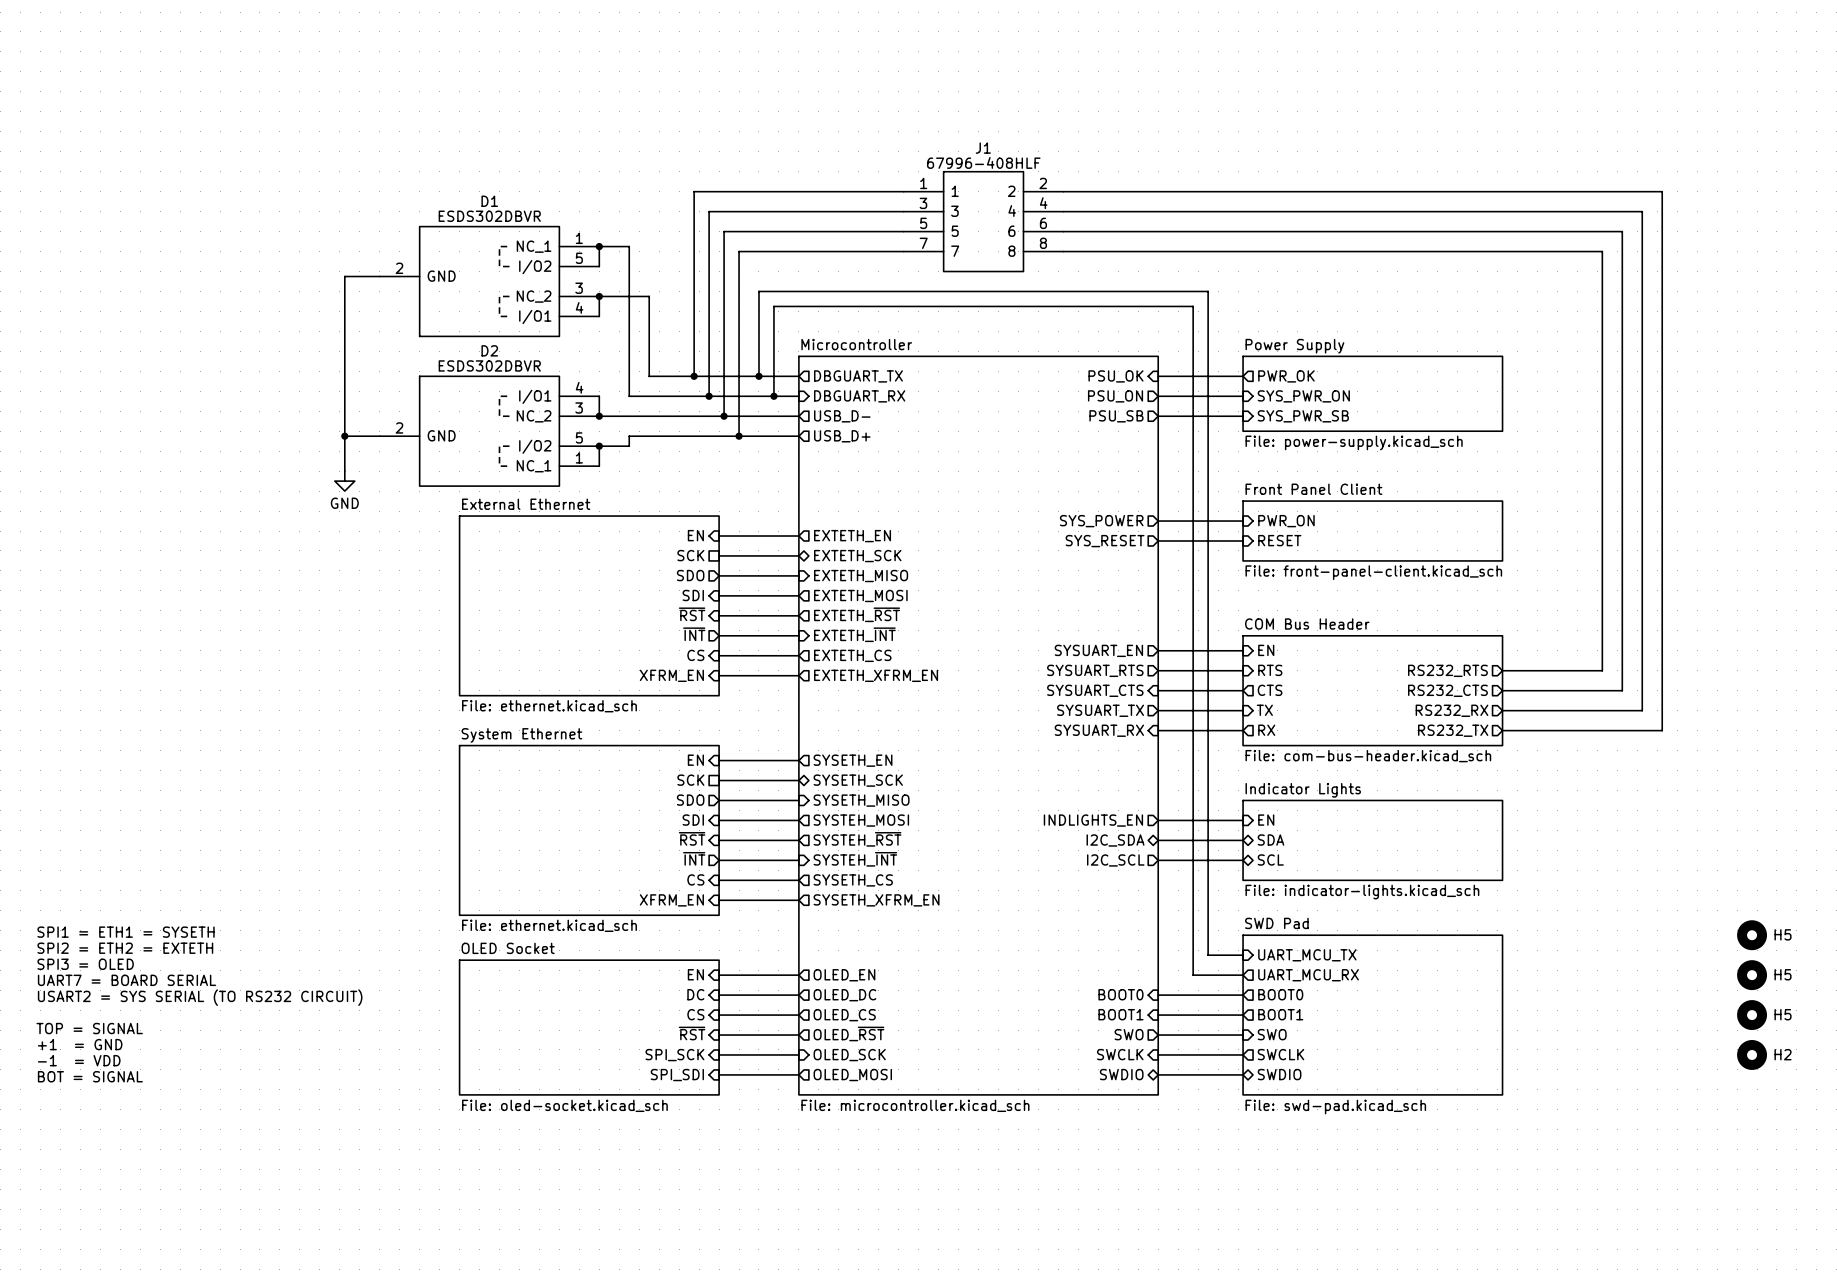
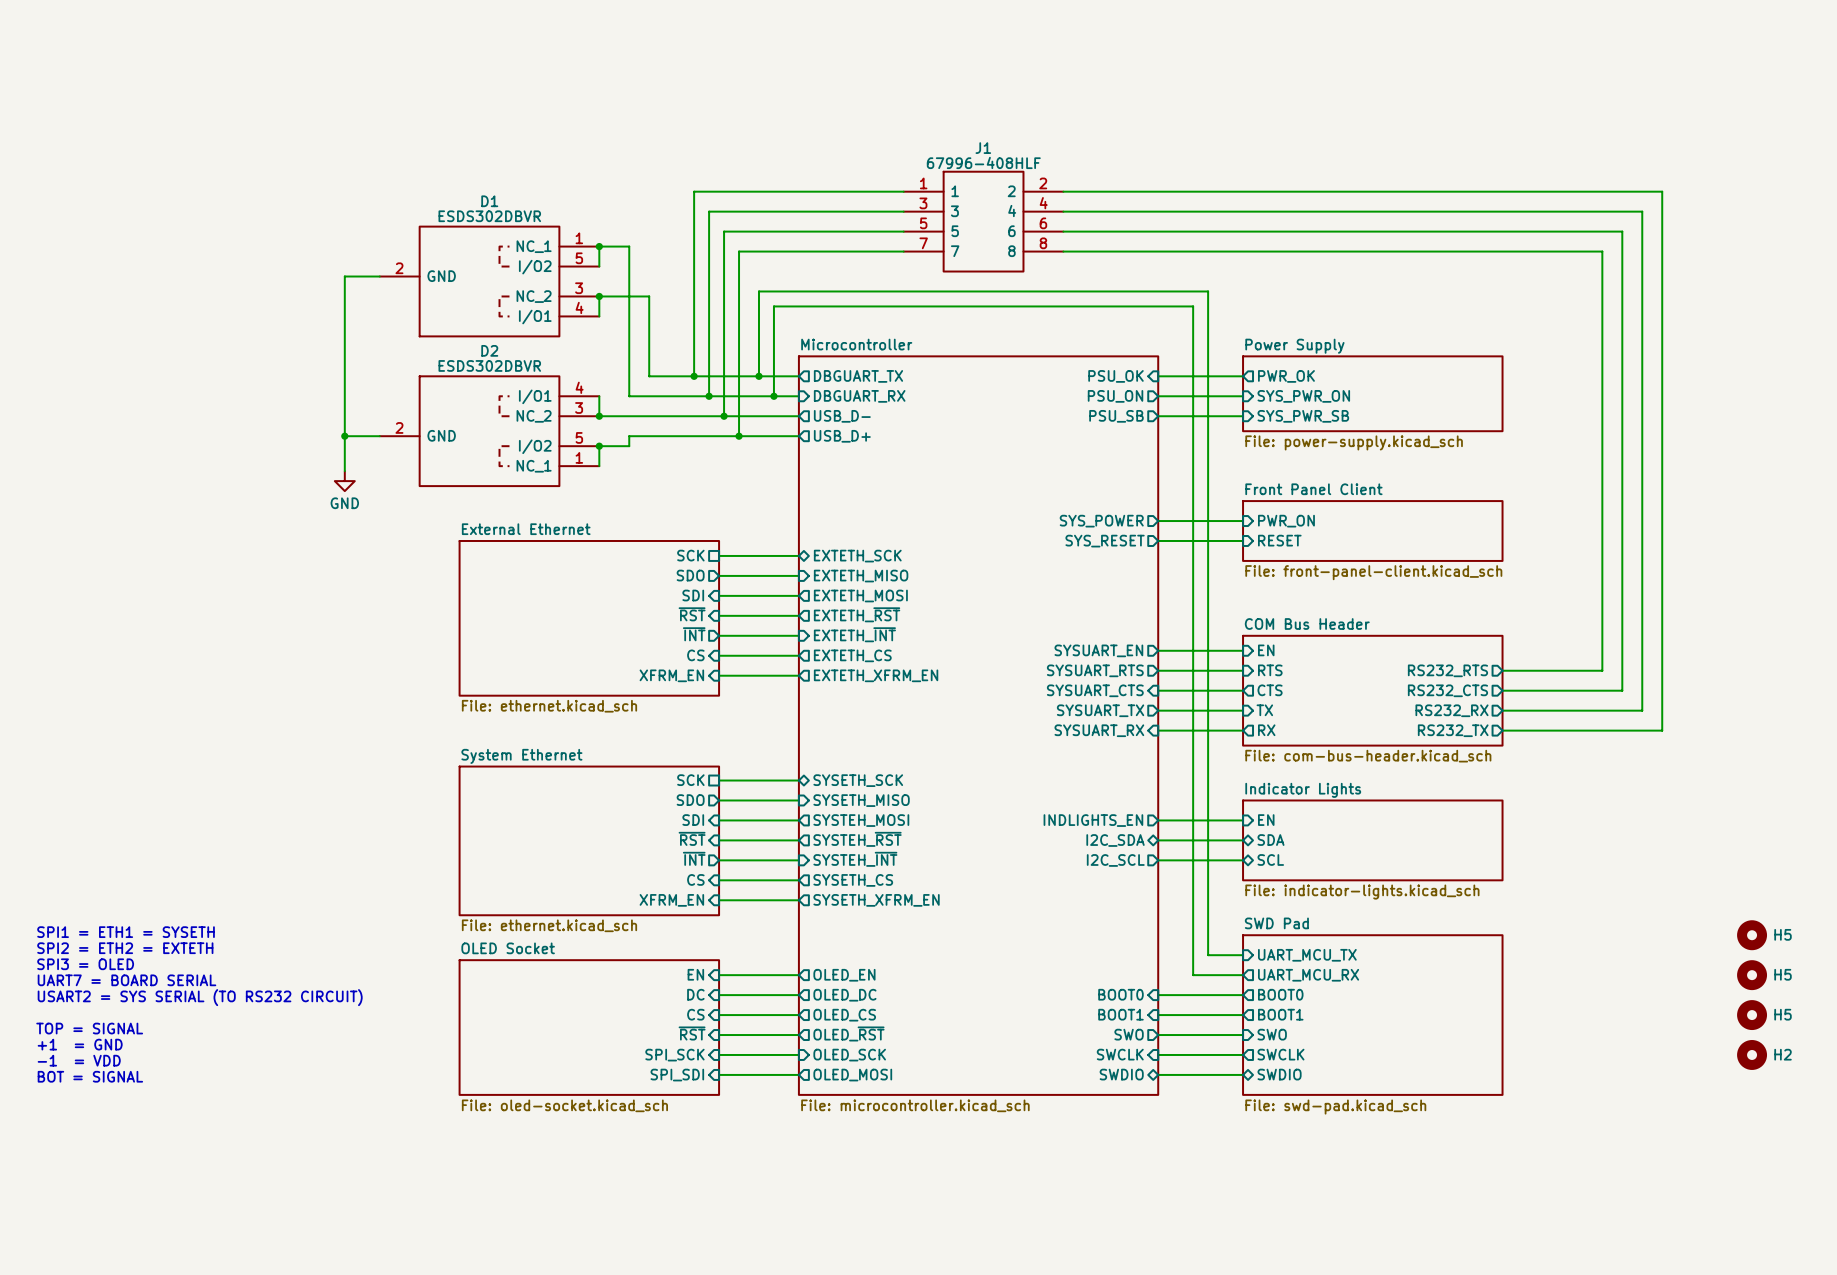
sheet pin: EN (695, 535) -> none
wire: (719, 536) (798, 536) -> none
sheet pin: EXTETH_EN (852, 536) -> none
sheet External Ethernet: File: ethernet.kicad_sch (589, 605) -> none
sheet External Ethernet: none -> File: ethernet.kicad_sch (589, 618)
sheet pin: EN (695, 760) -> none
wire: (719, 760) (798, 760) -> none
sheet pin: SYSETH_EN (853, 760) -> none
sheet System Ethernet: File: ethernet.kicad_sch (589, 830) -> none
sheet System Ethernet: none -> File: ethernet.kicad_sch (589, 840)

